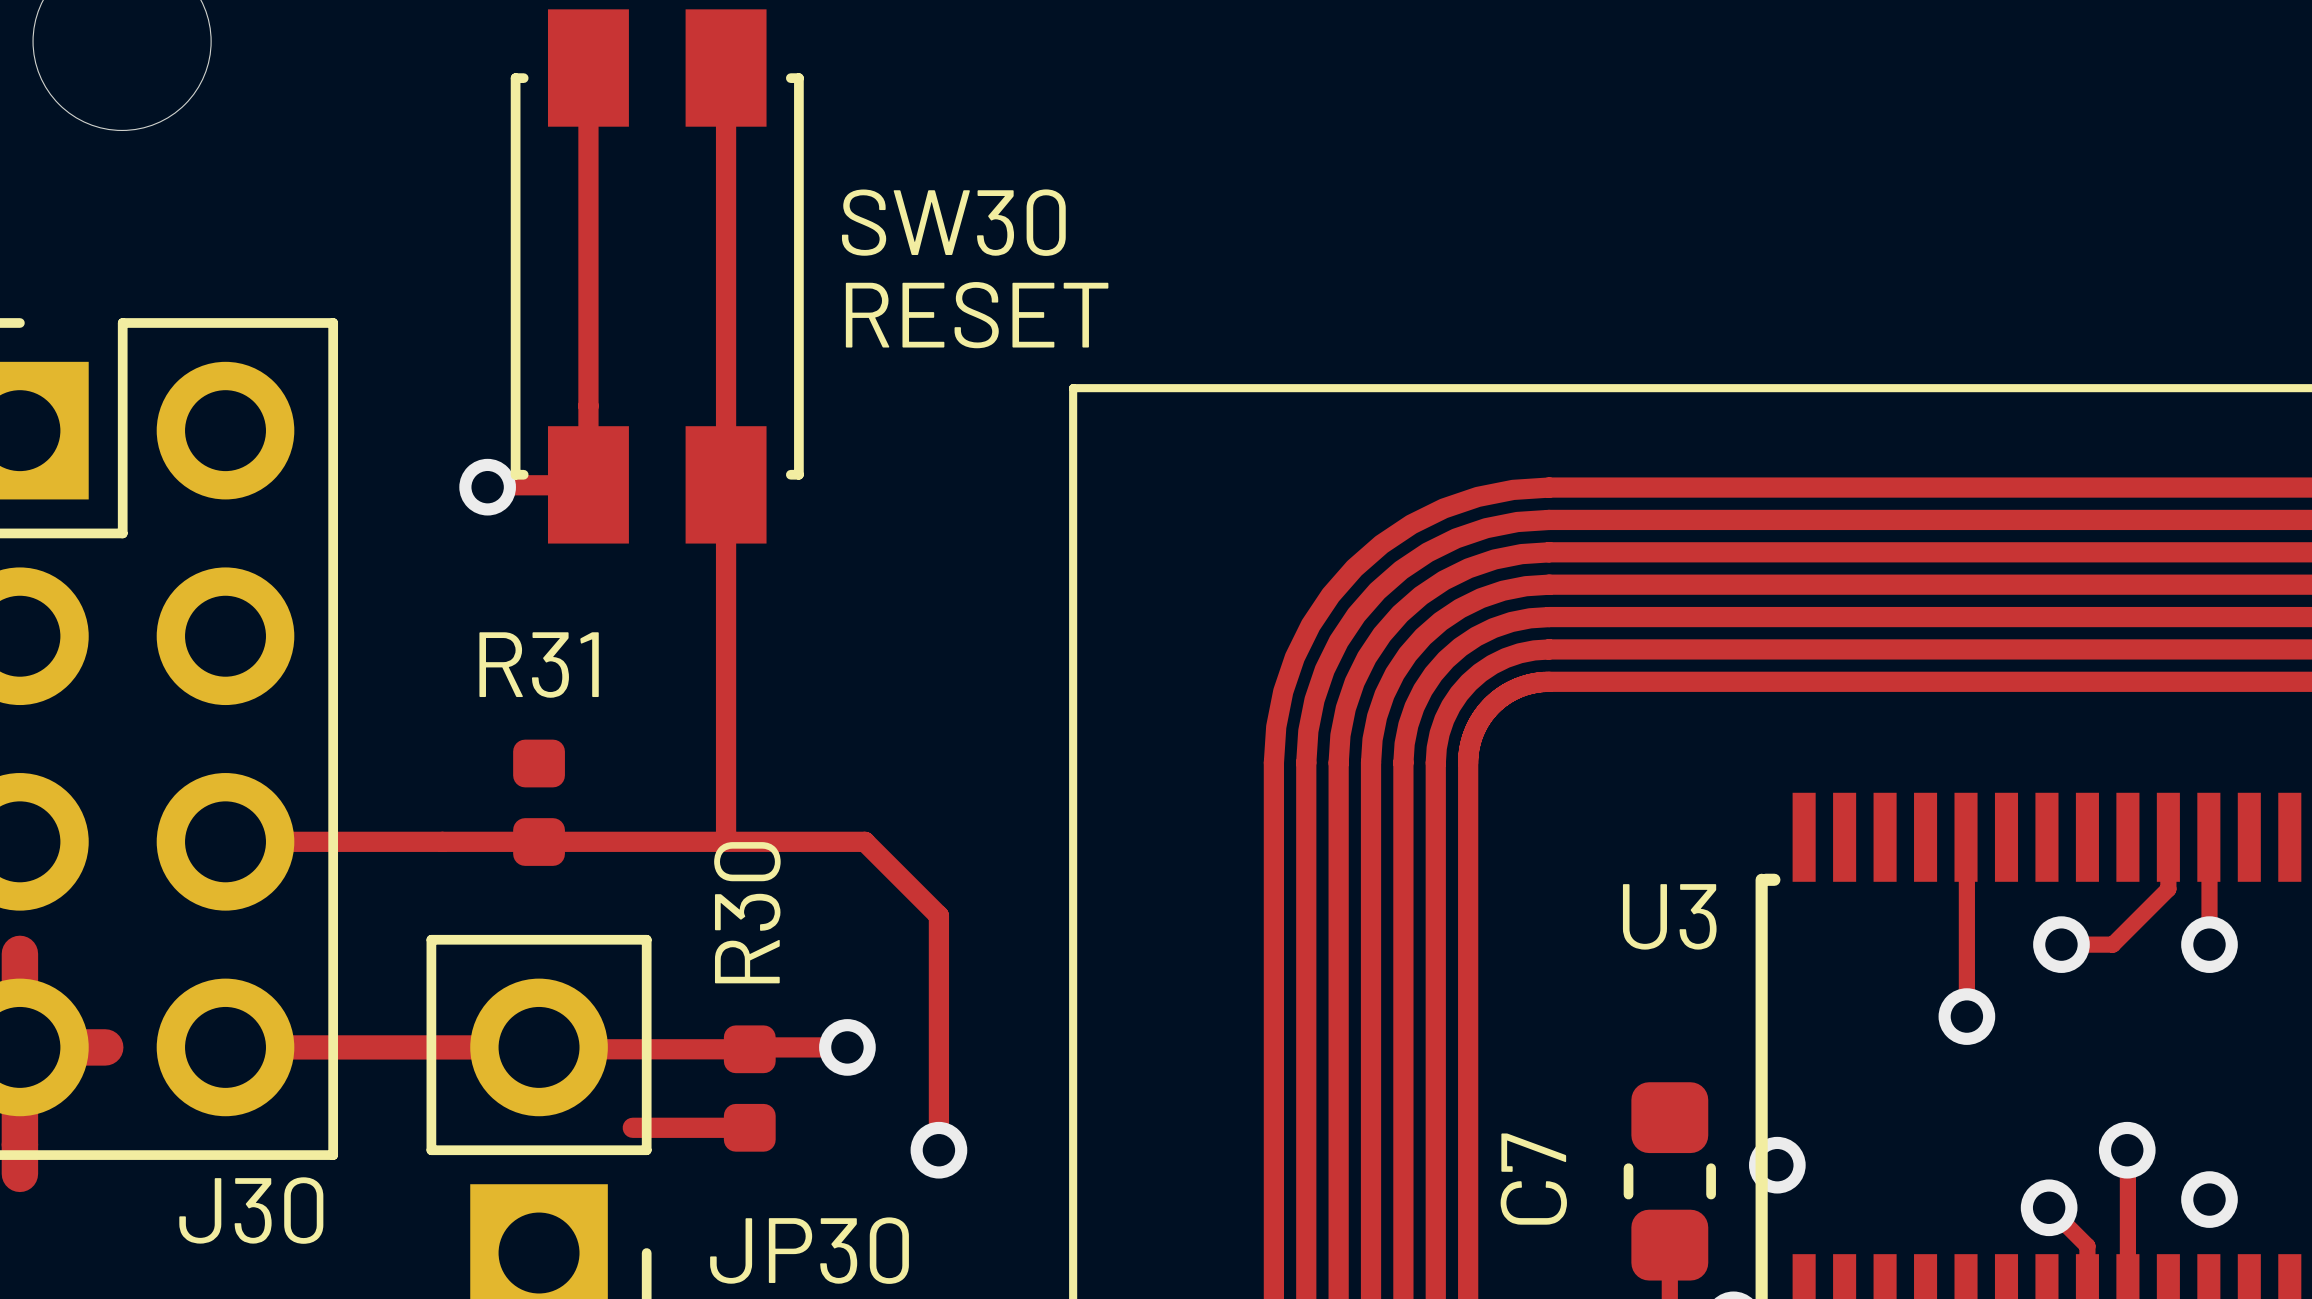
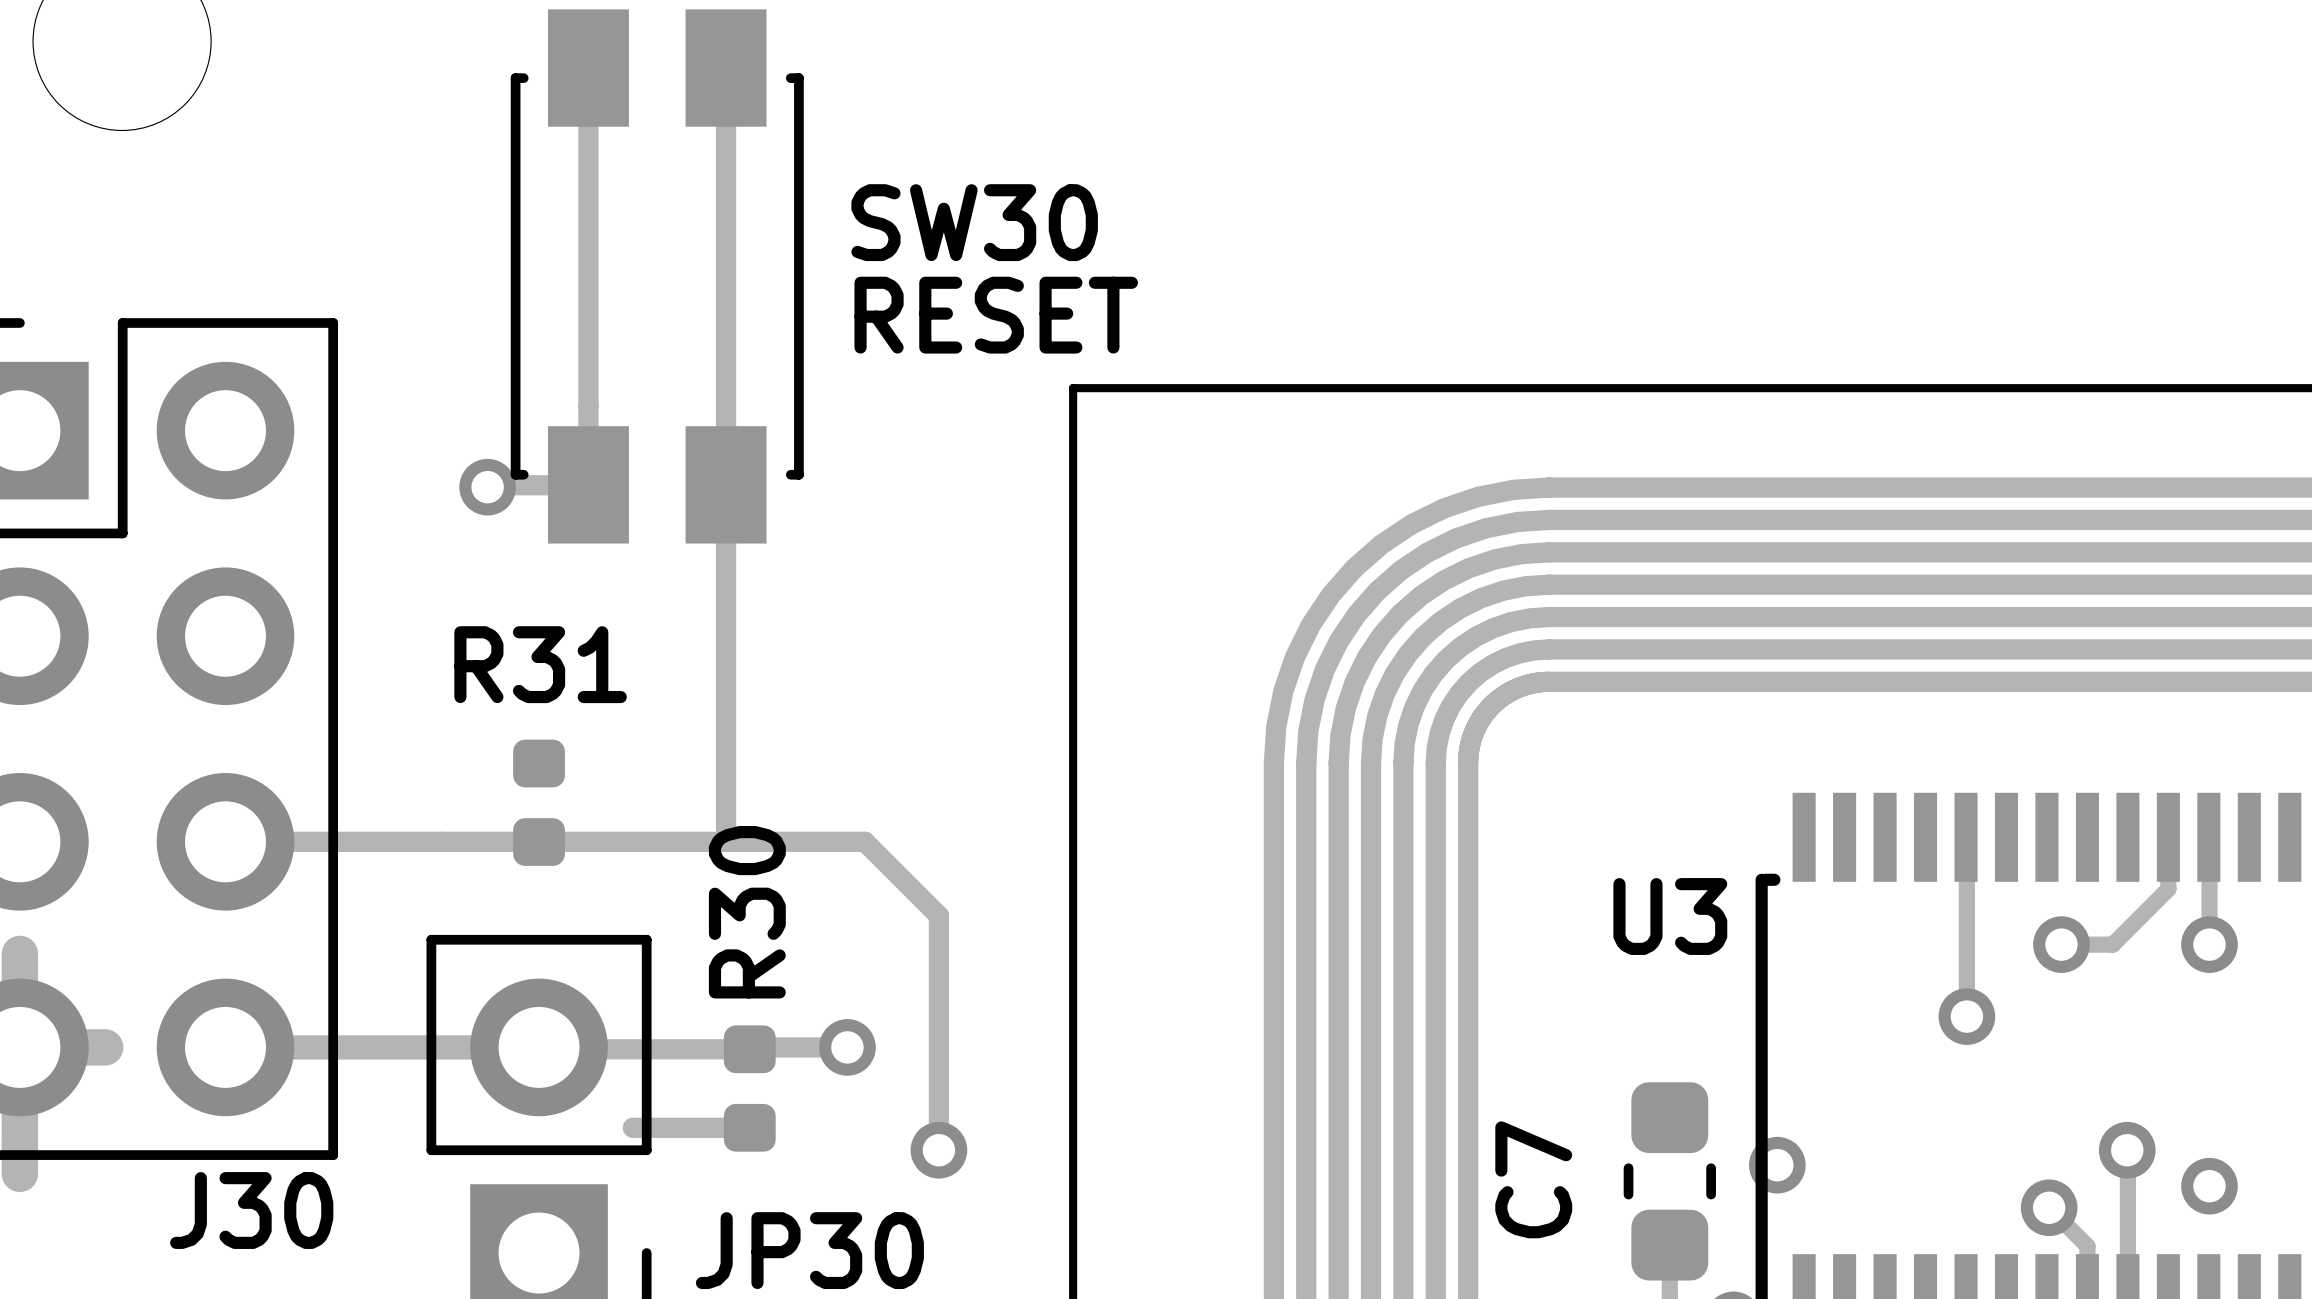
via position: (2209, 1199) -> (2209, 1186)

